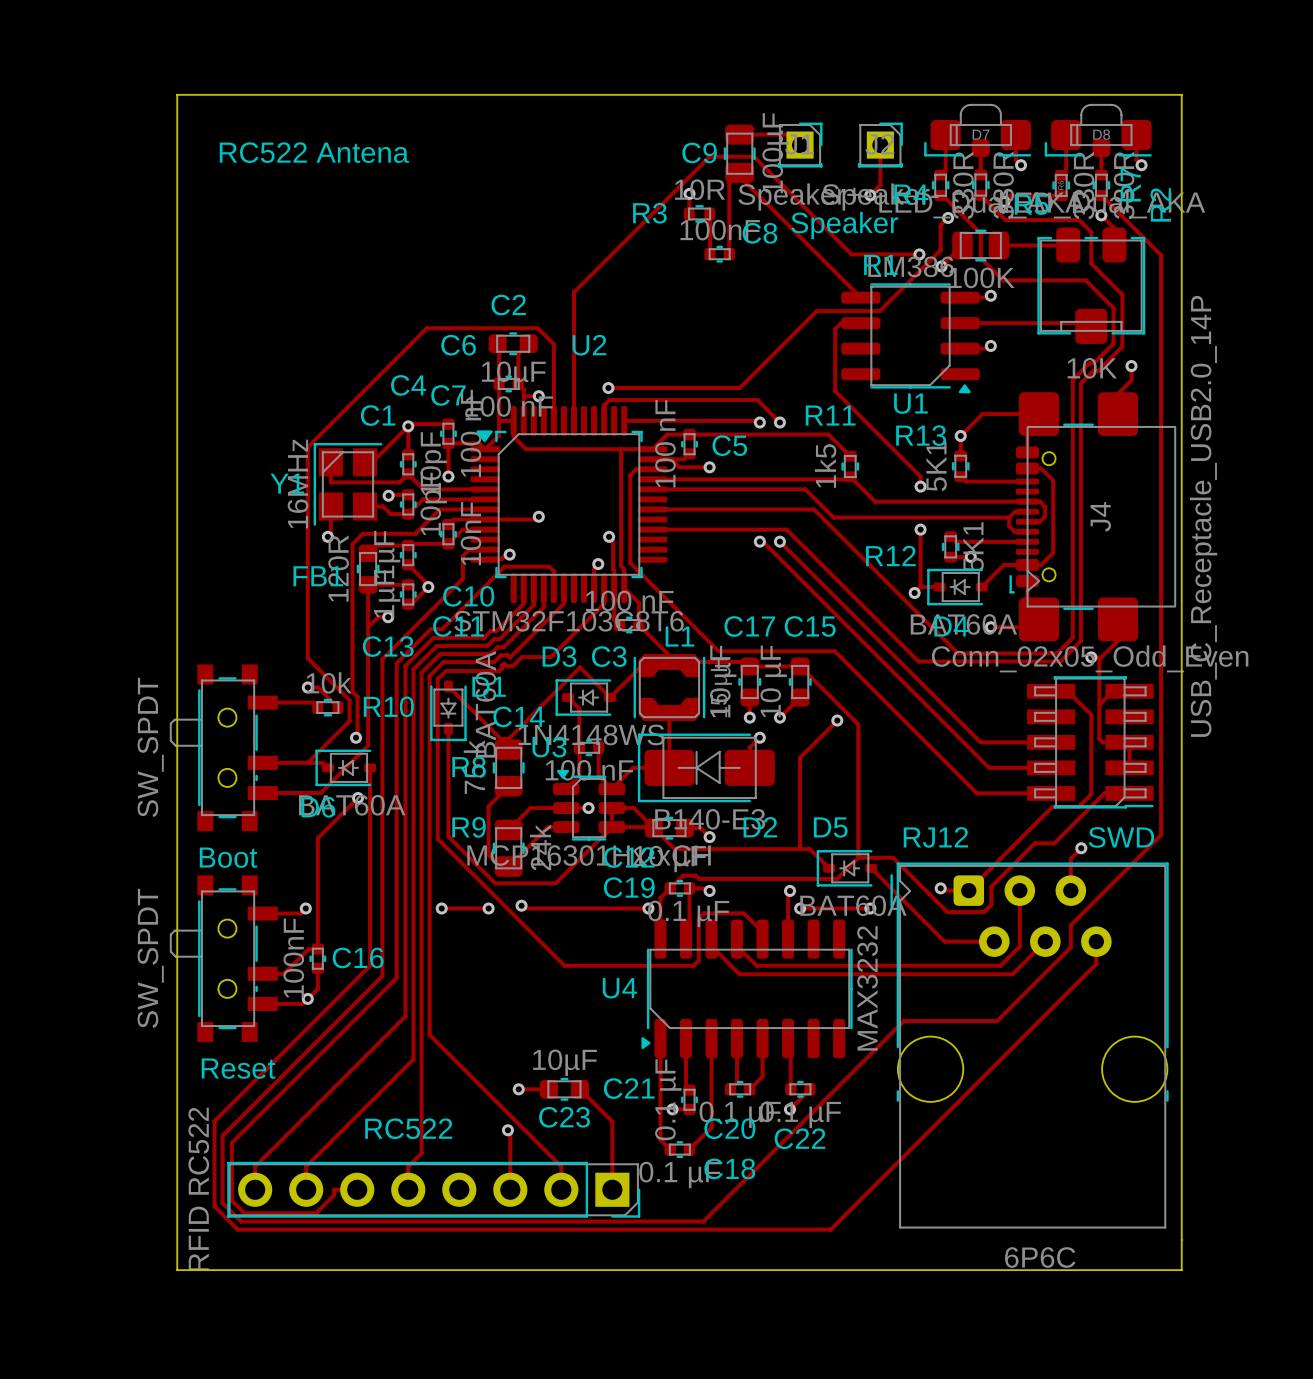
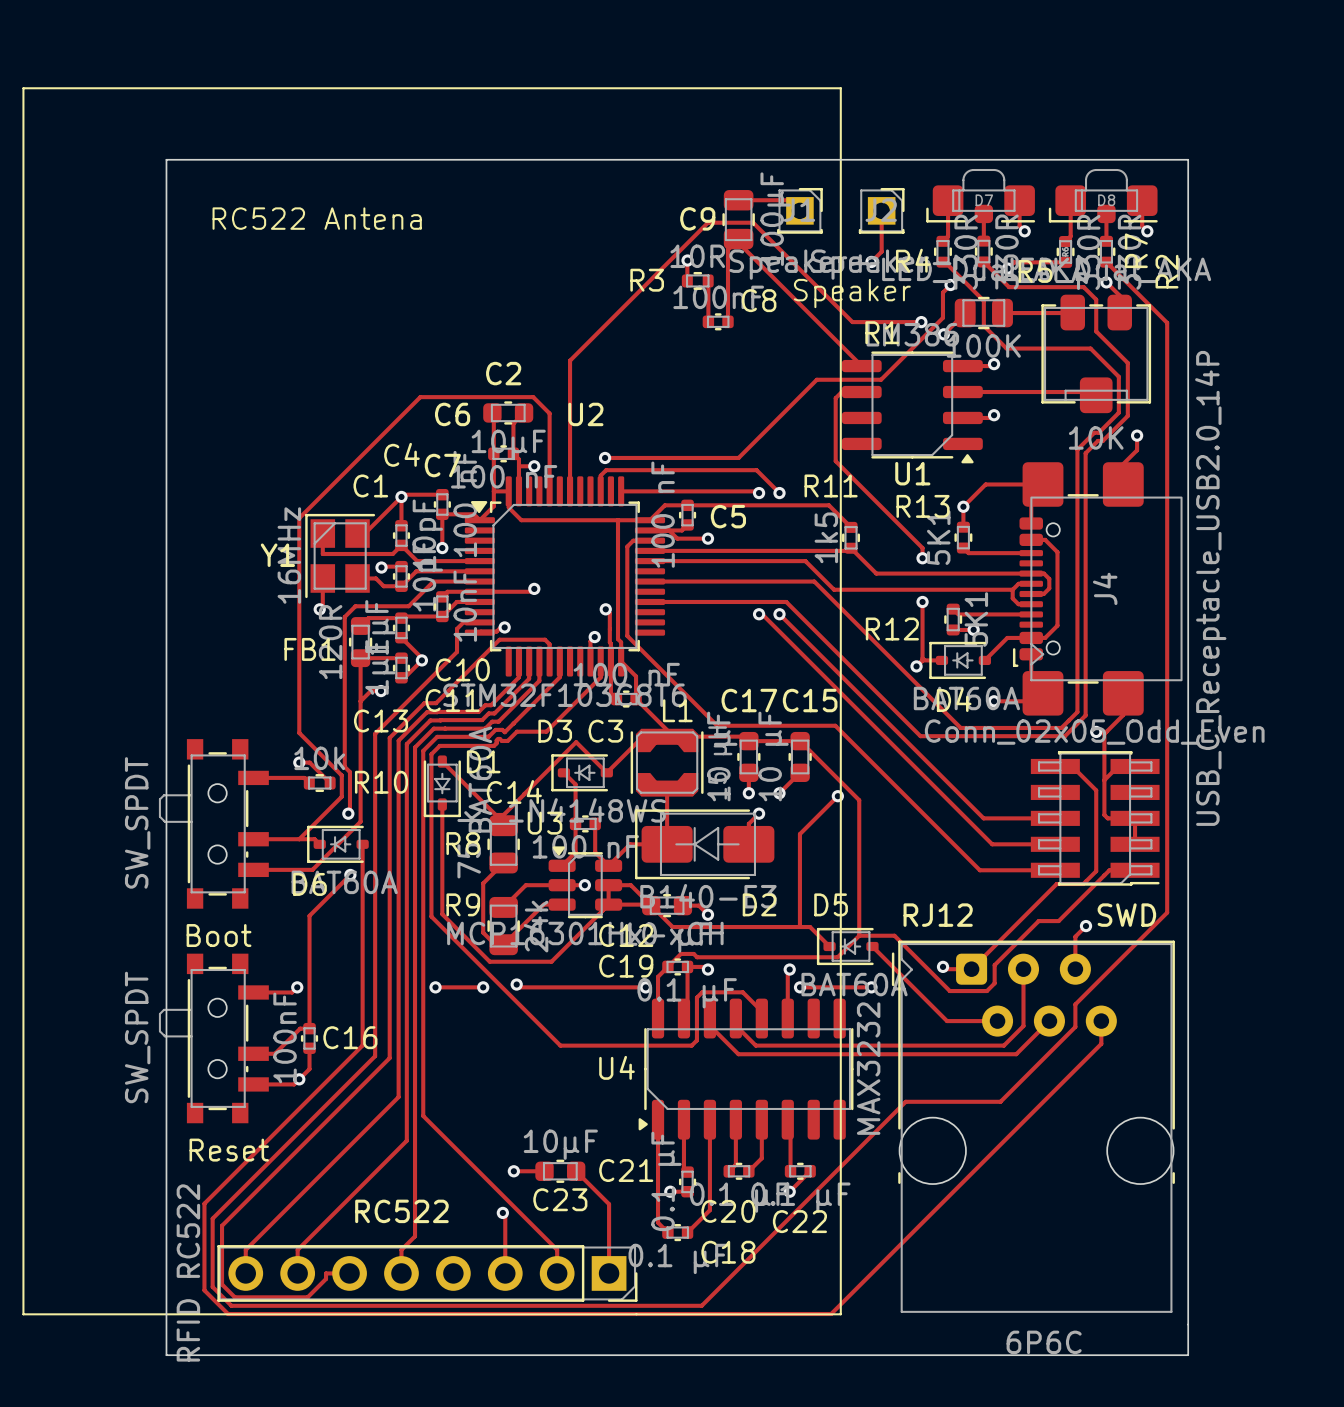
line: none -> (23, 88) (840, 88) (840, 1314) (23, 1314) (23, 88)

